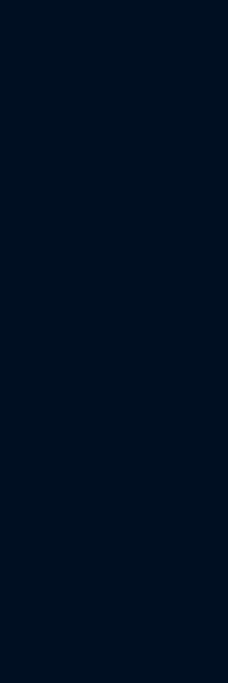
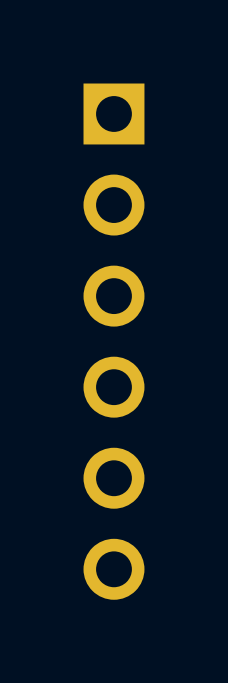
part: none -> (113, 341)

